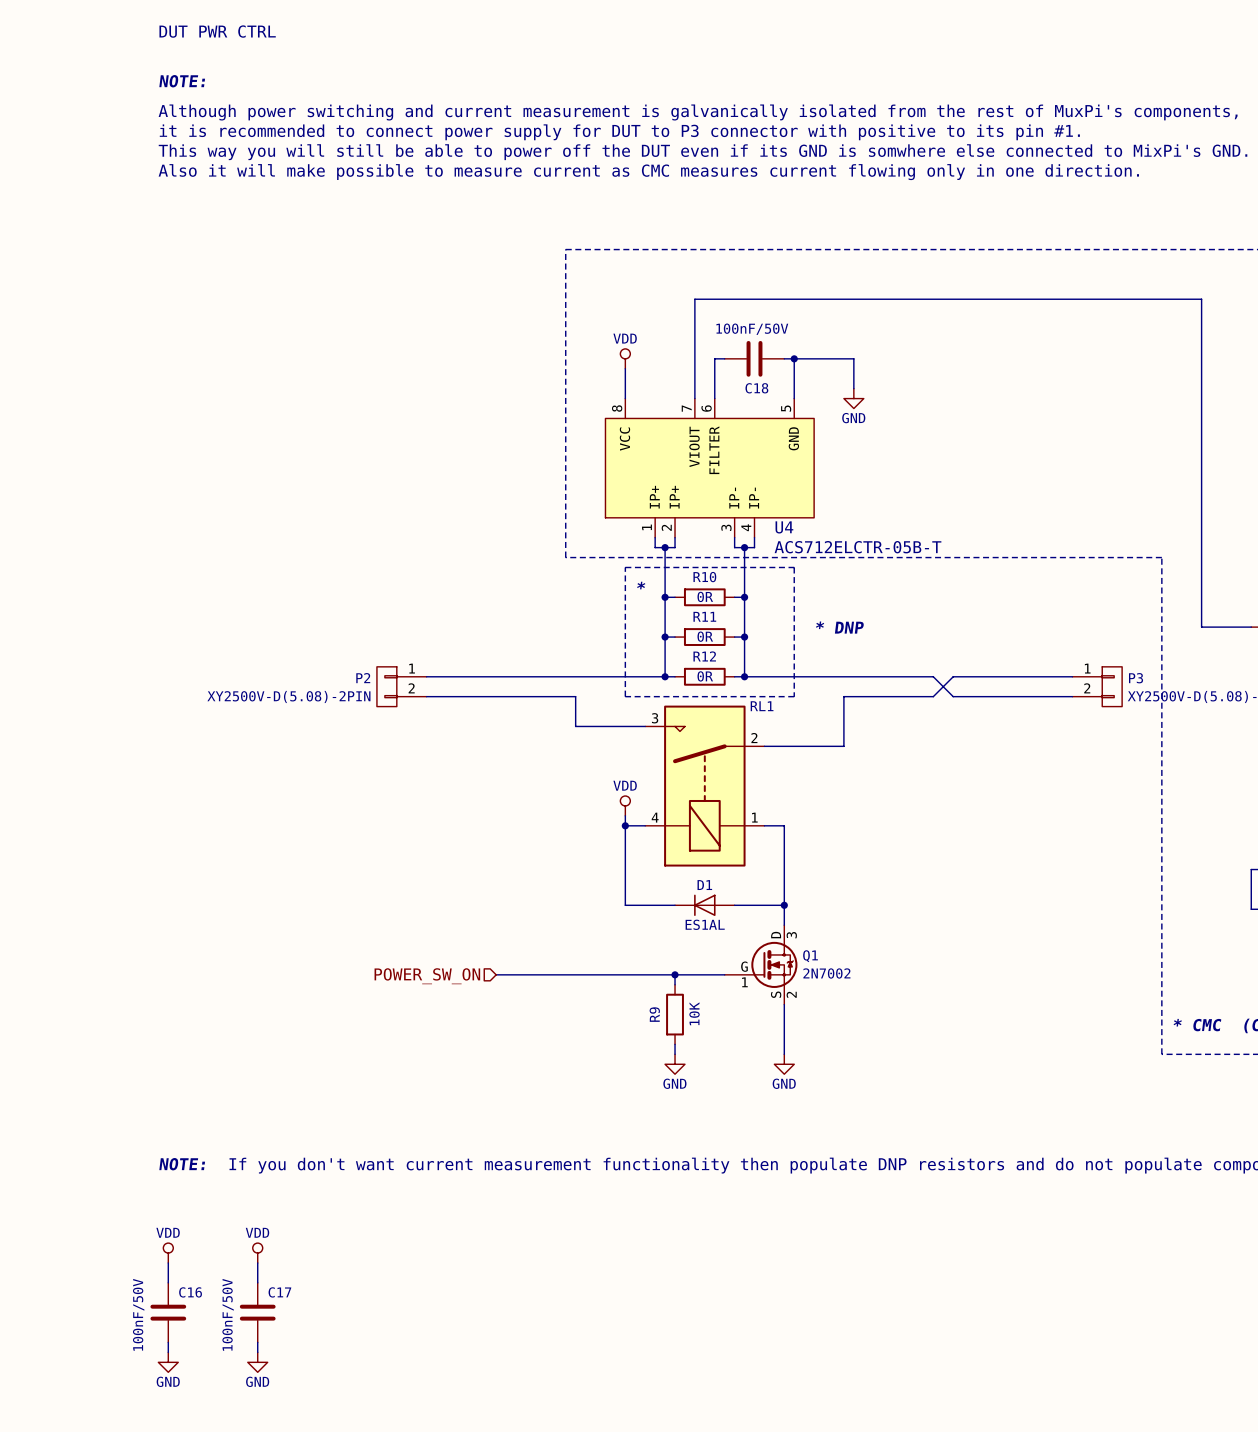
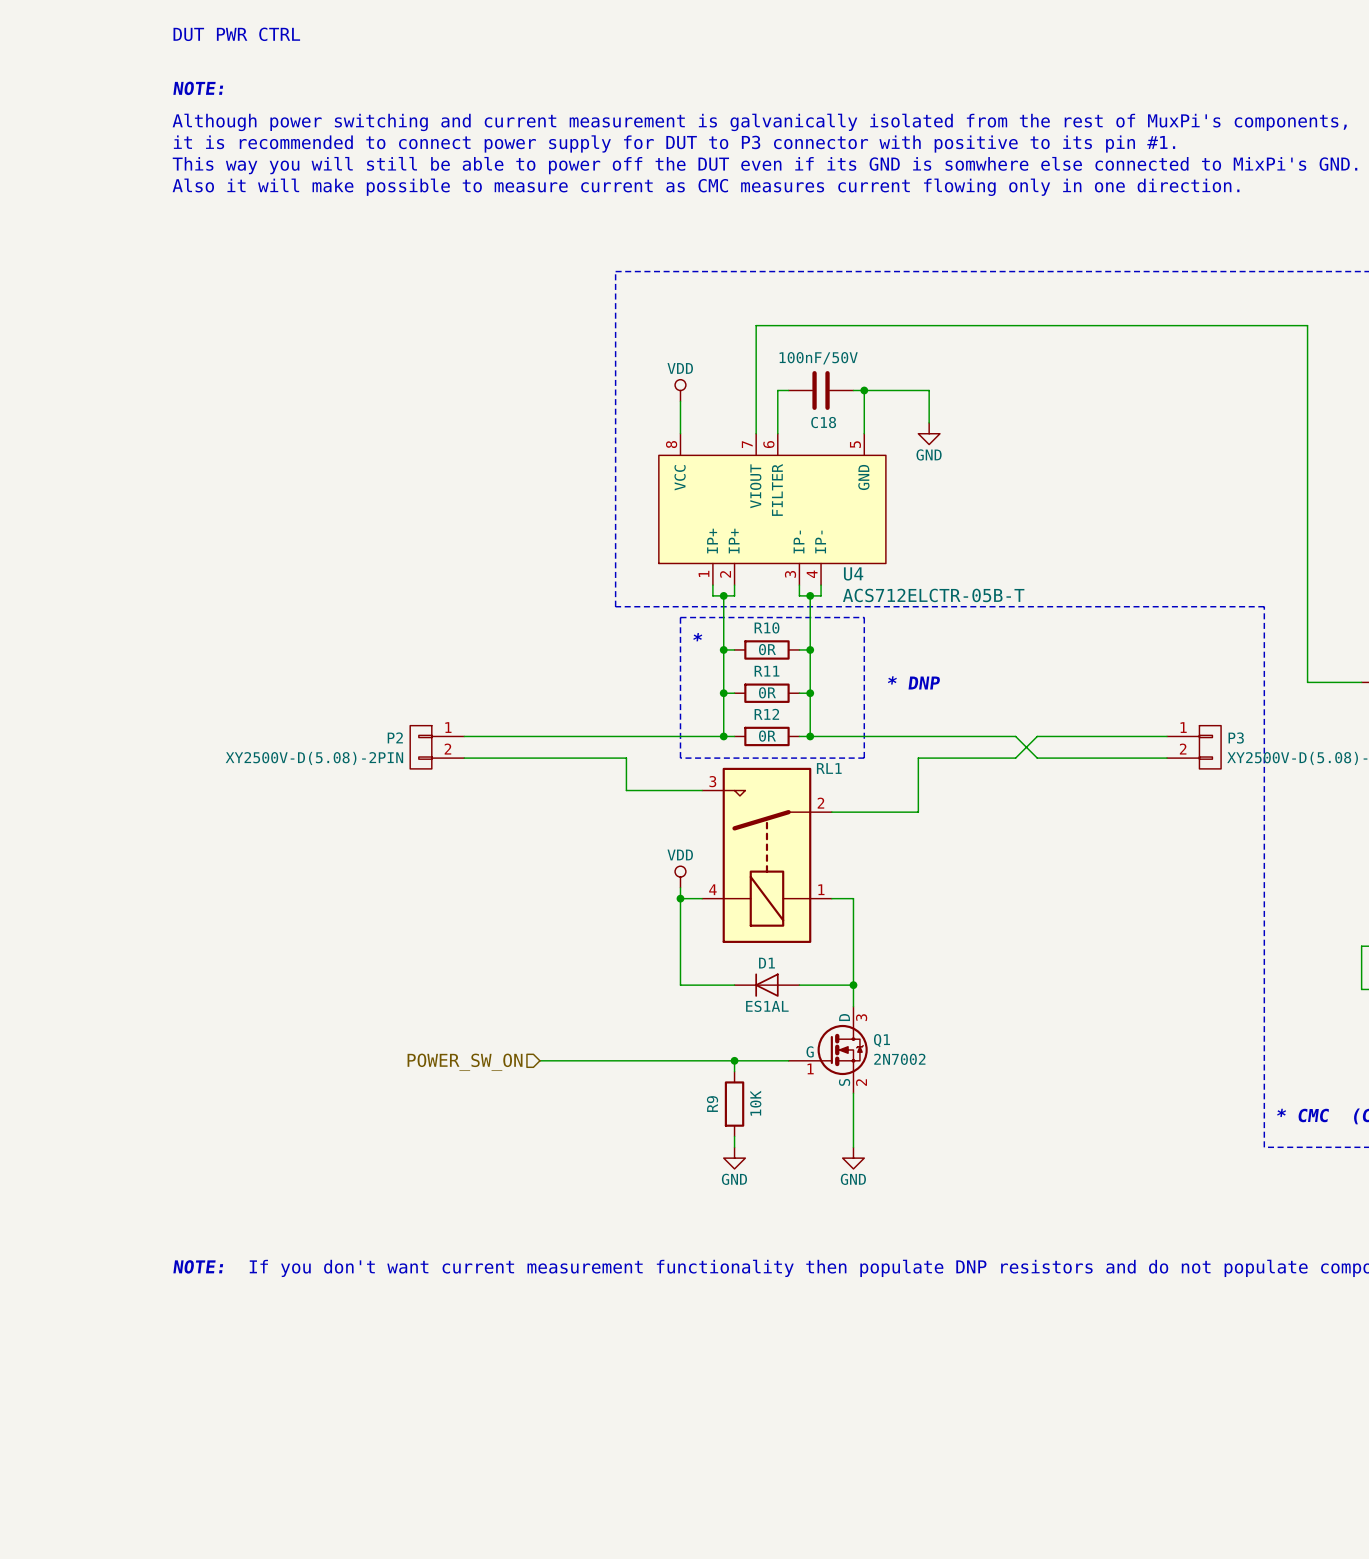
power symbol: VDD (168, 1253) -> none
power symbol: VDD (257, 1253) -> none
wire: (168, 1262) (168, 1282) -> none
wire: (257, 1262) (257, 1282) -> none
C16: 100nF/50V (168, 1312) -> none
C17: 100nF/50V (257, 1312) -> none
wire: (168, 1342) (168, 1352) -> none
wire: (257, 1342) (257, 1352) -> none
power symbol: GND (168, 1362) -> none
power symbol: GND (257, 1362) -> none

